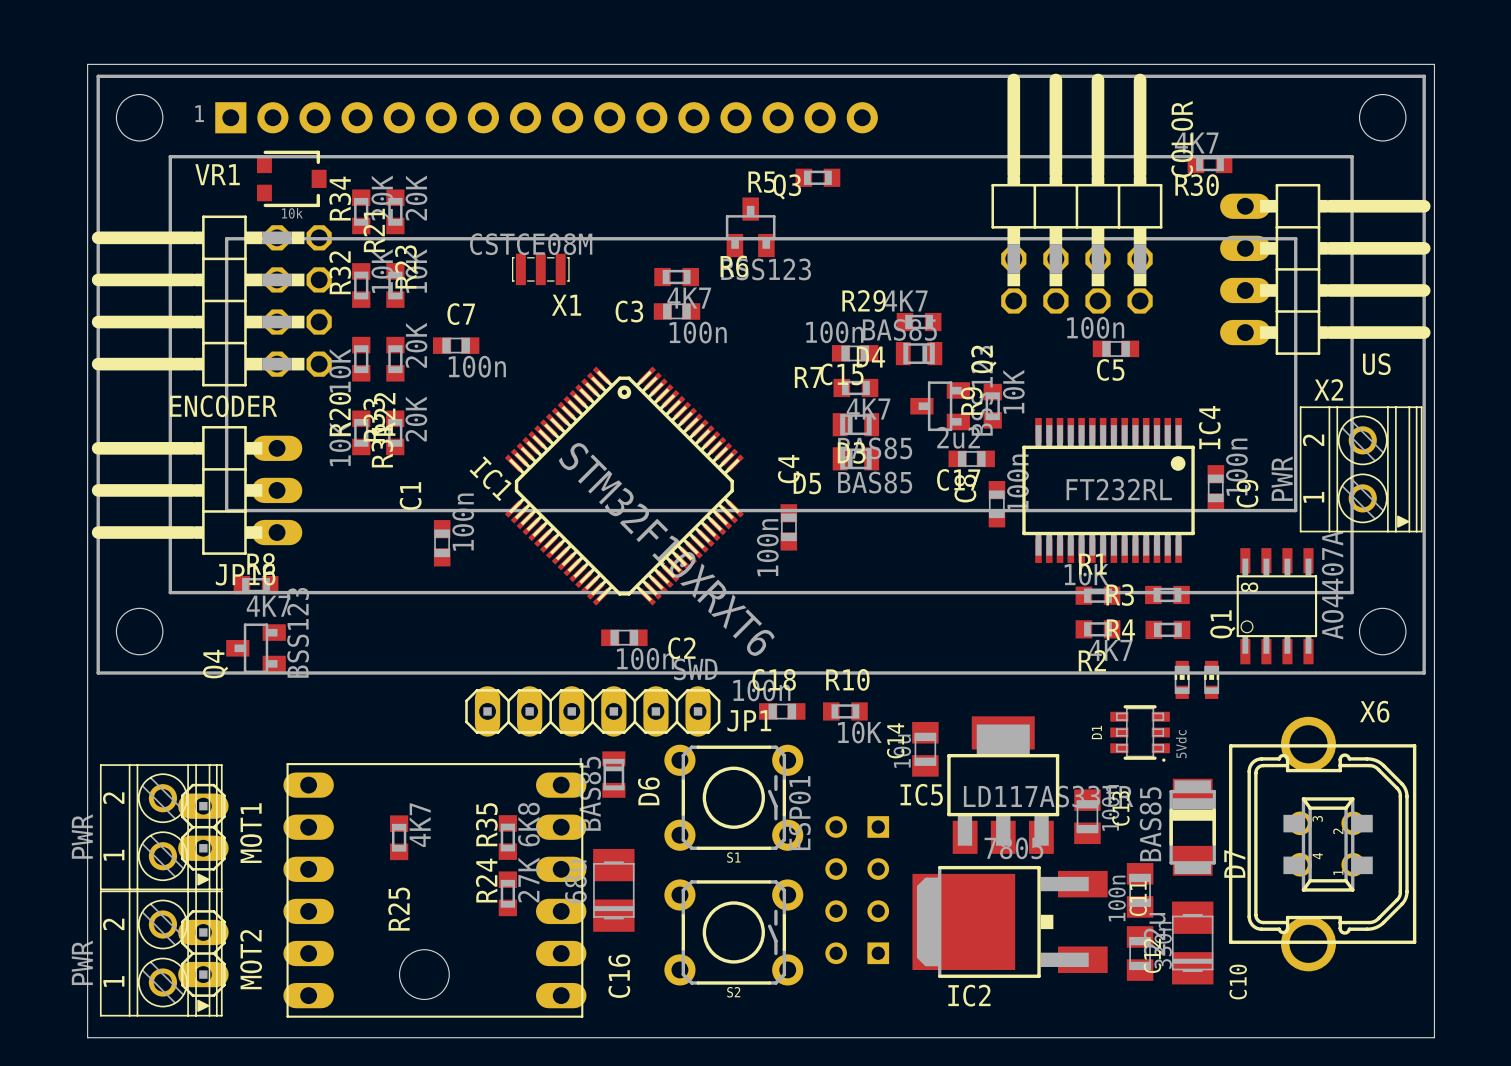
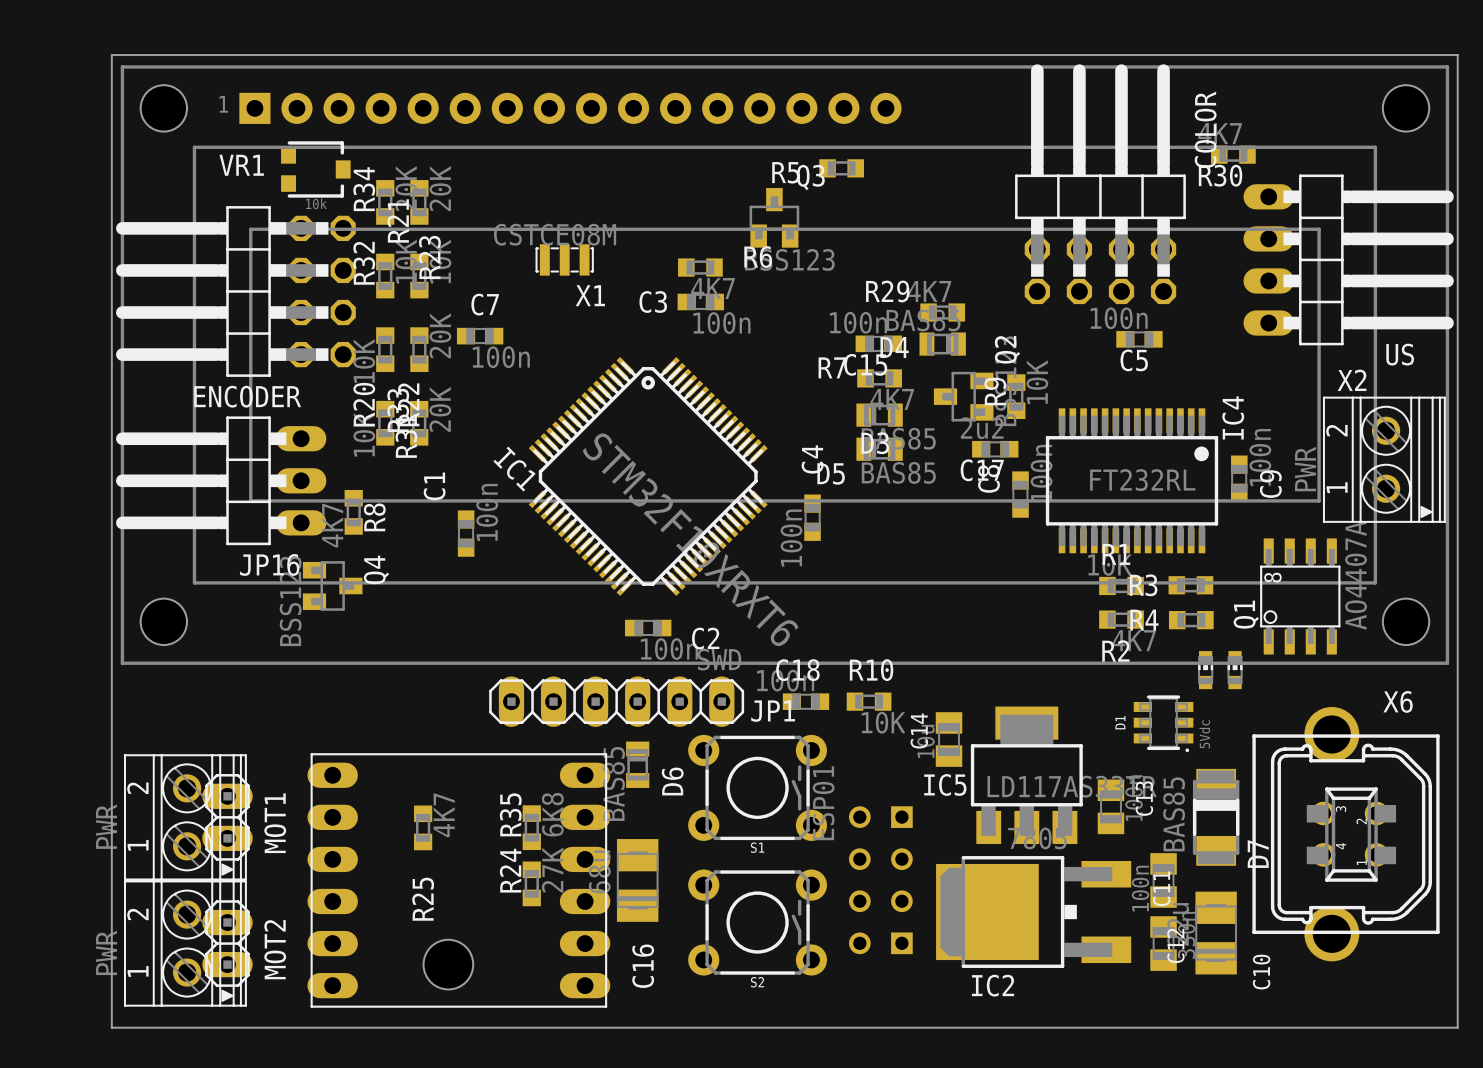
R8 rotation: 0° (256, 585) -> 90° clockwise (353, 512)
R8 position: (256, 585) -> (353, 512)
Q4 rotation: 0° (256, 648) -> 180° (332, 585)
Q4 position: (256, 648) -> (332, 585)

